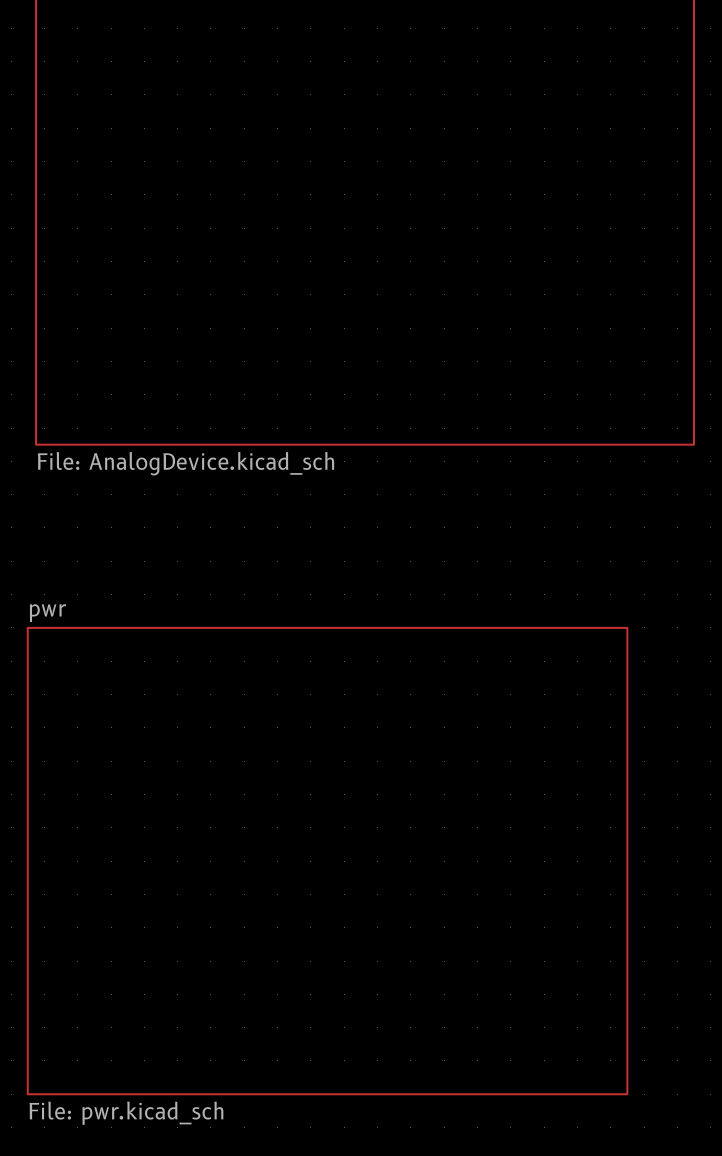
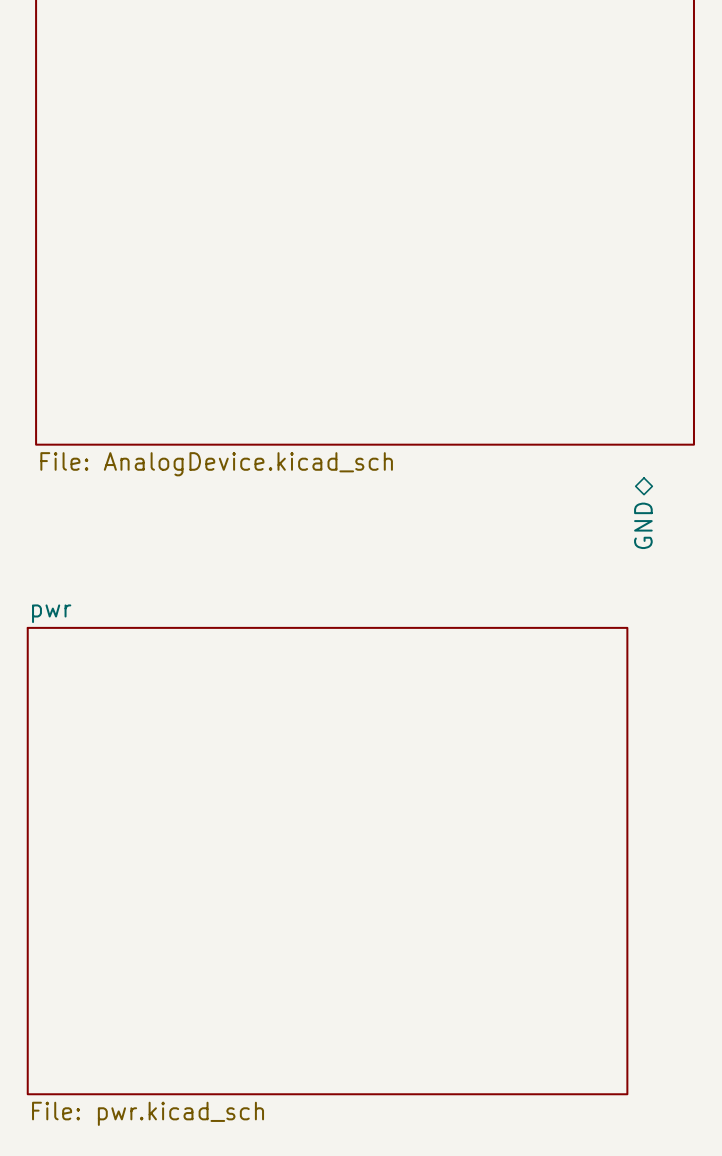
sheet pin: none -> GND (643, 525)

